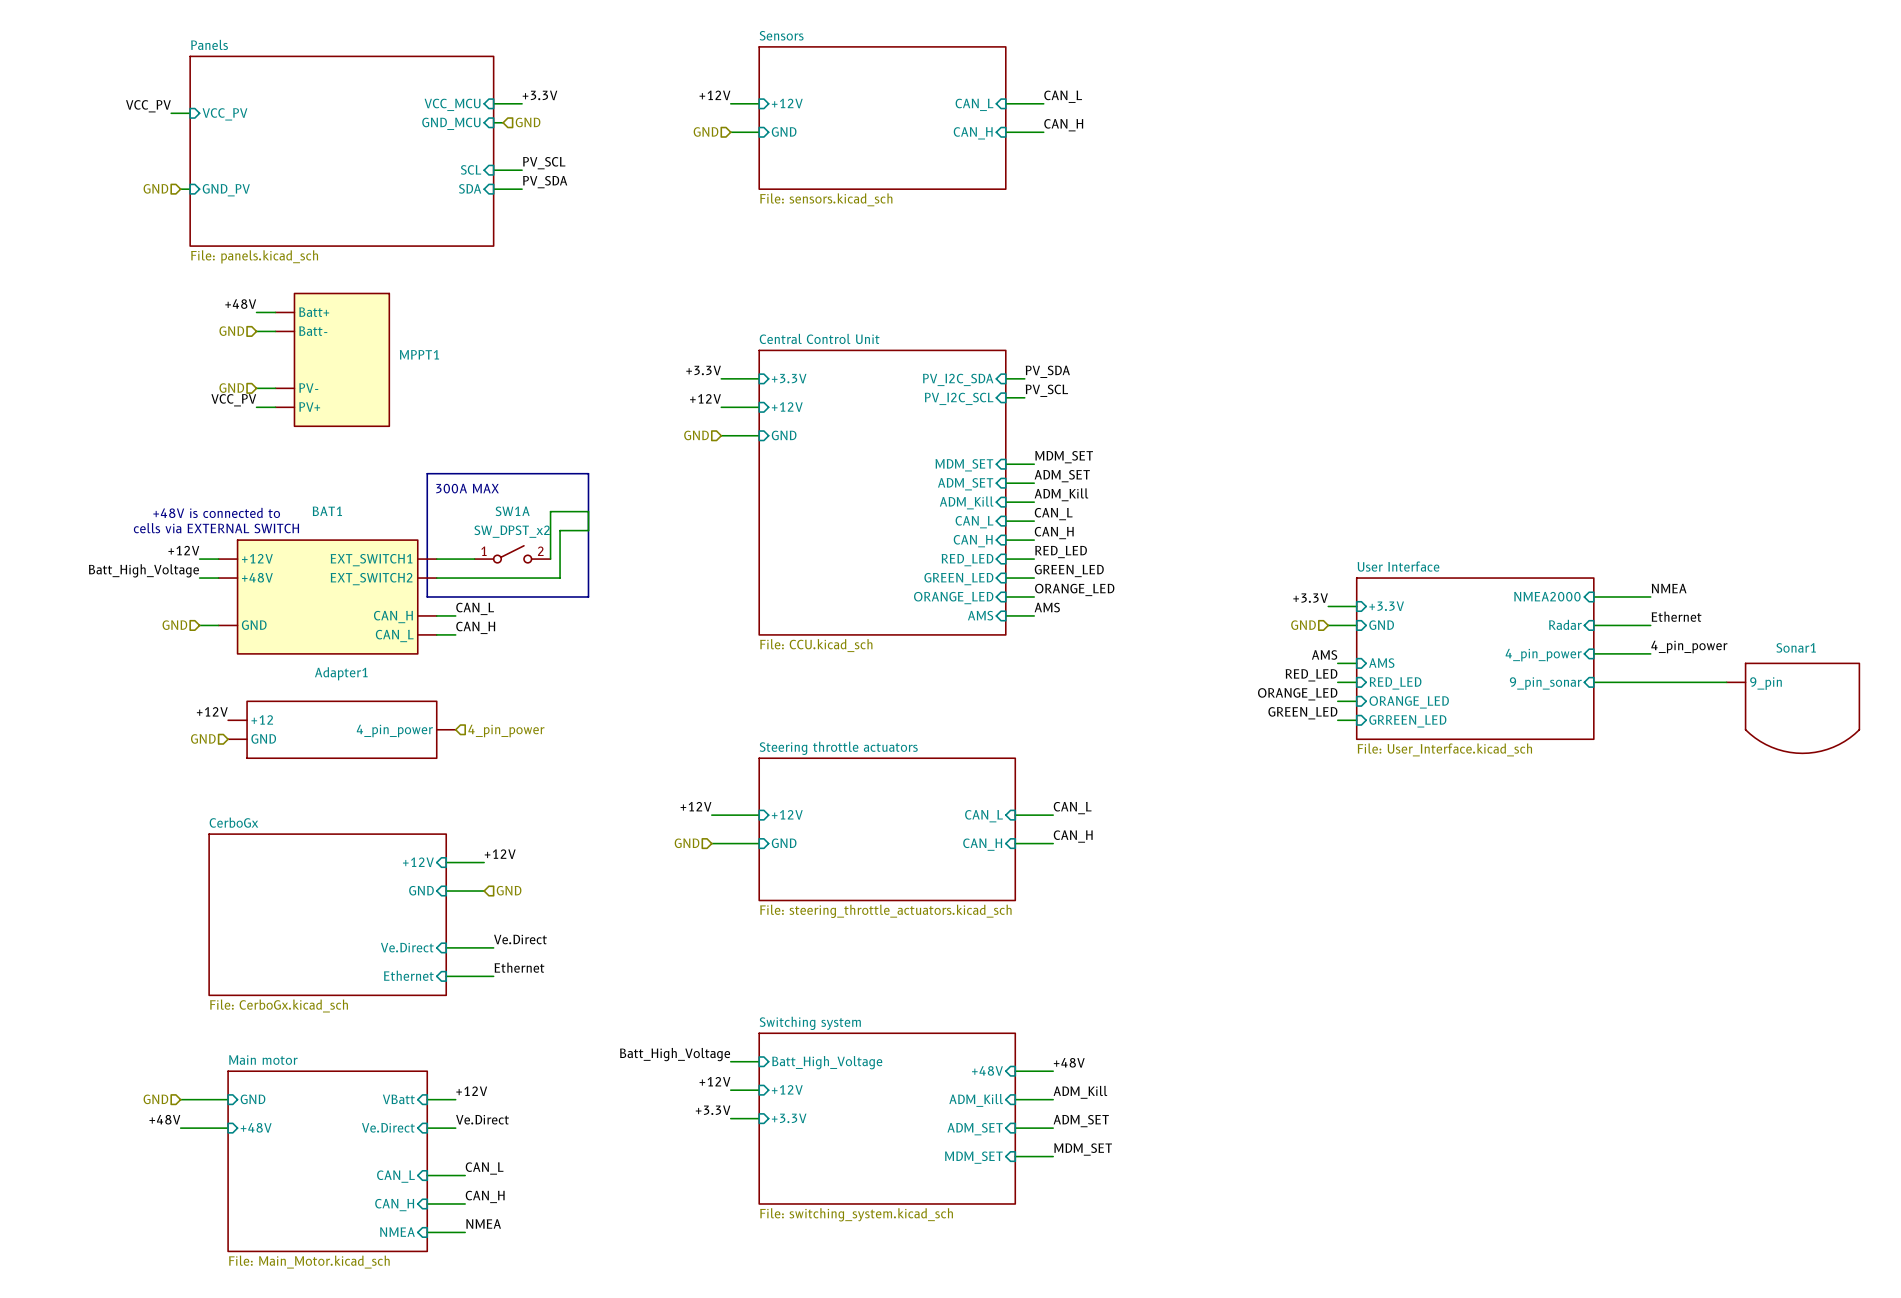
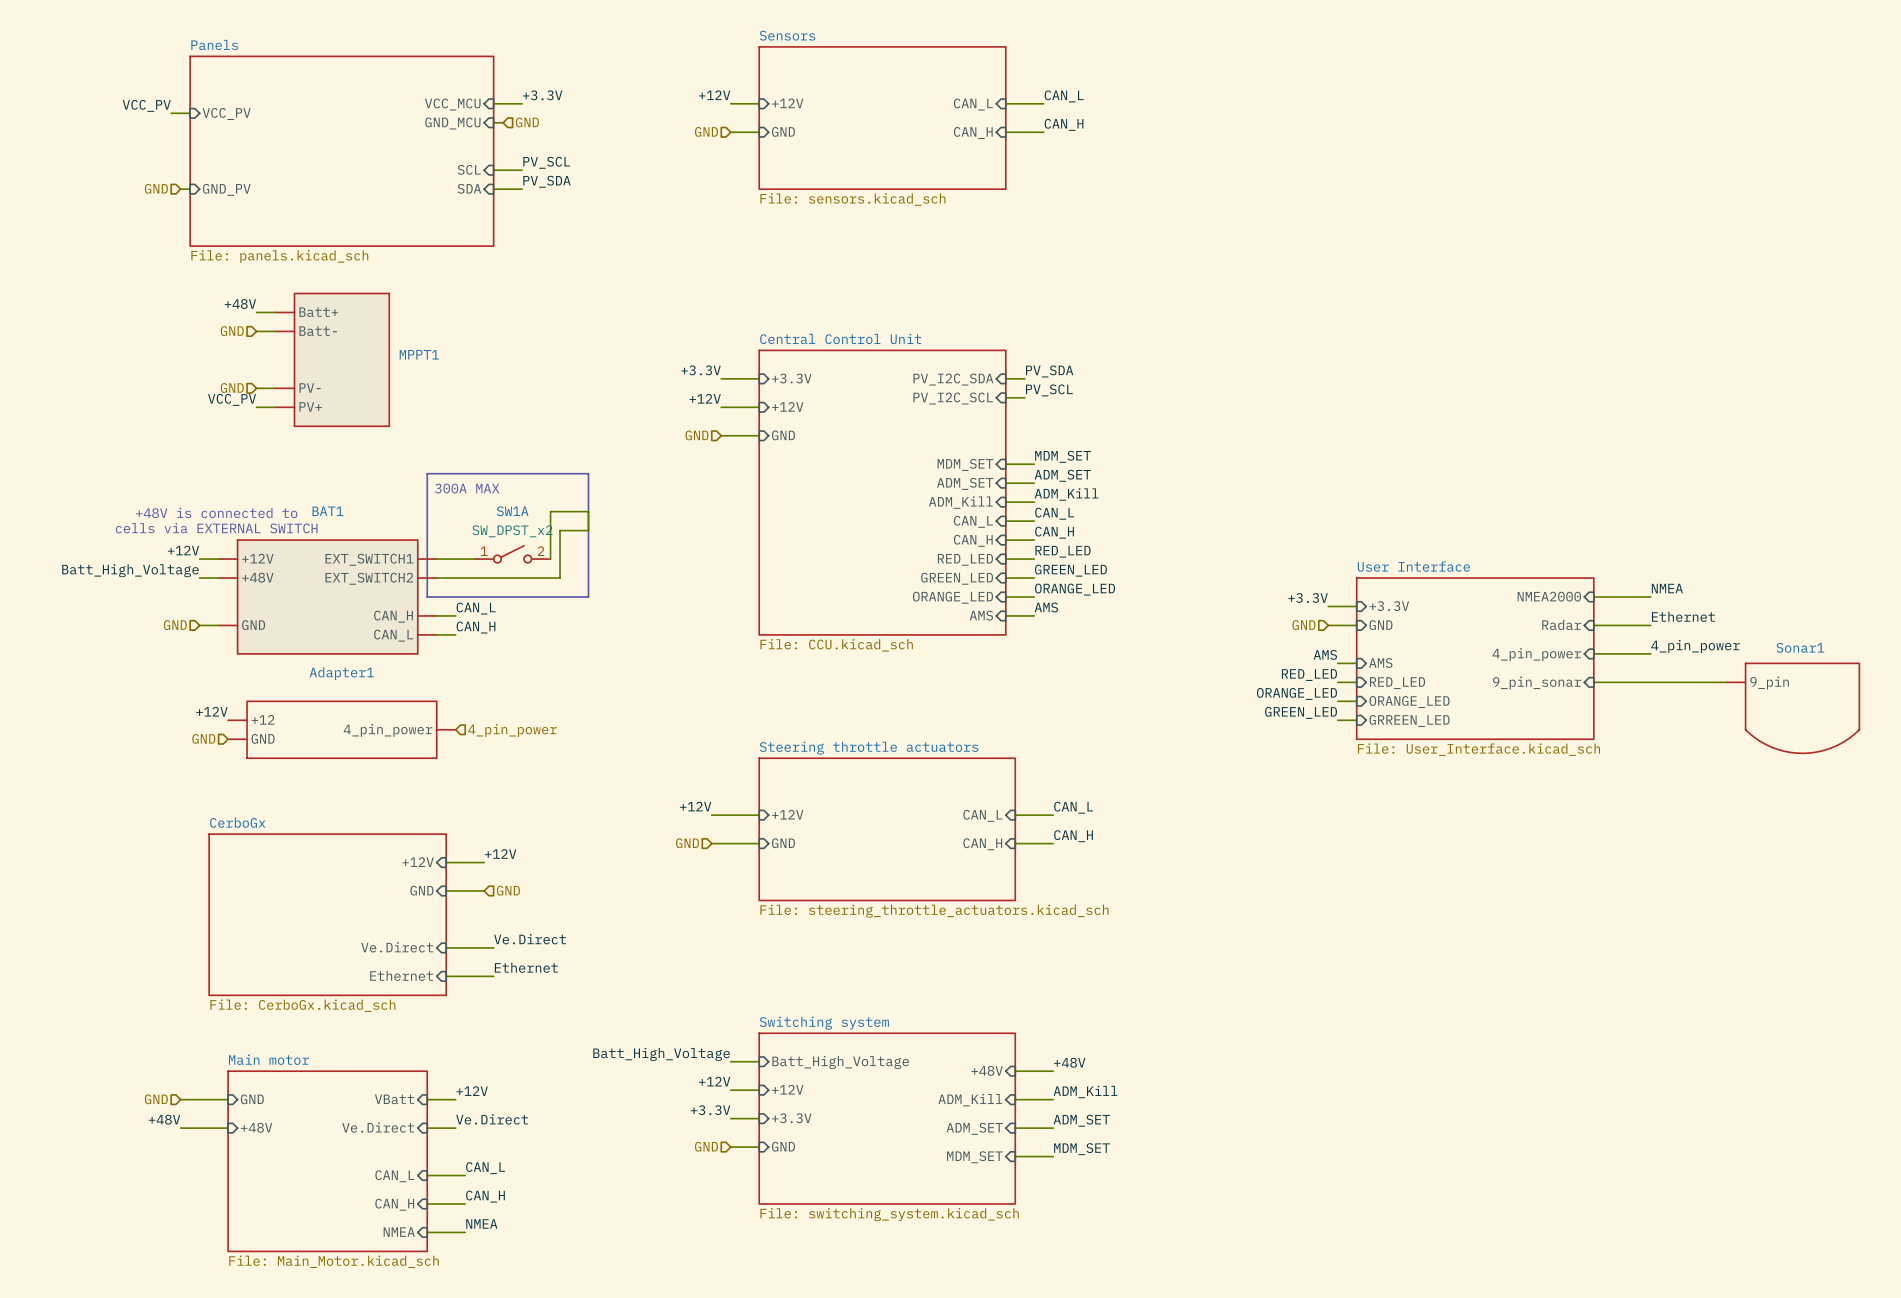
hierarchical label: none -> GND (706, 1146)
sheet pin: none -> GND (783, 1146)
wire: none -> (730, 1147) (759, 1147)

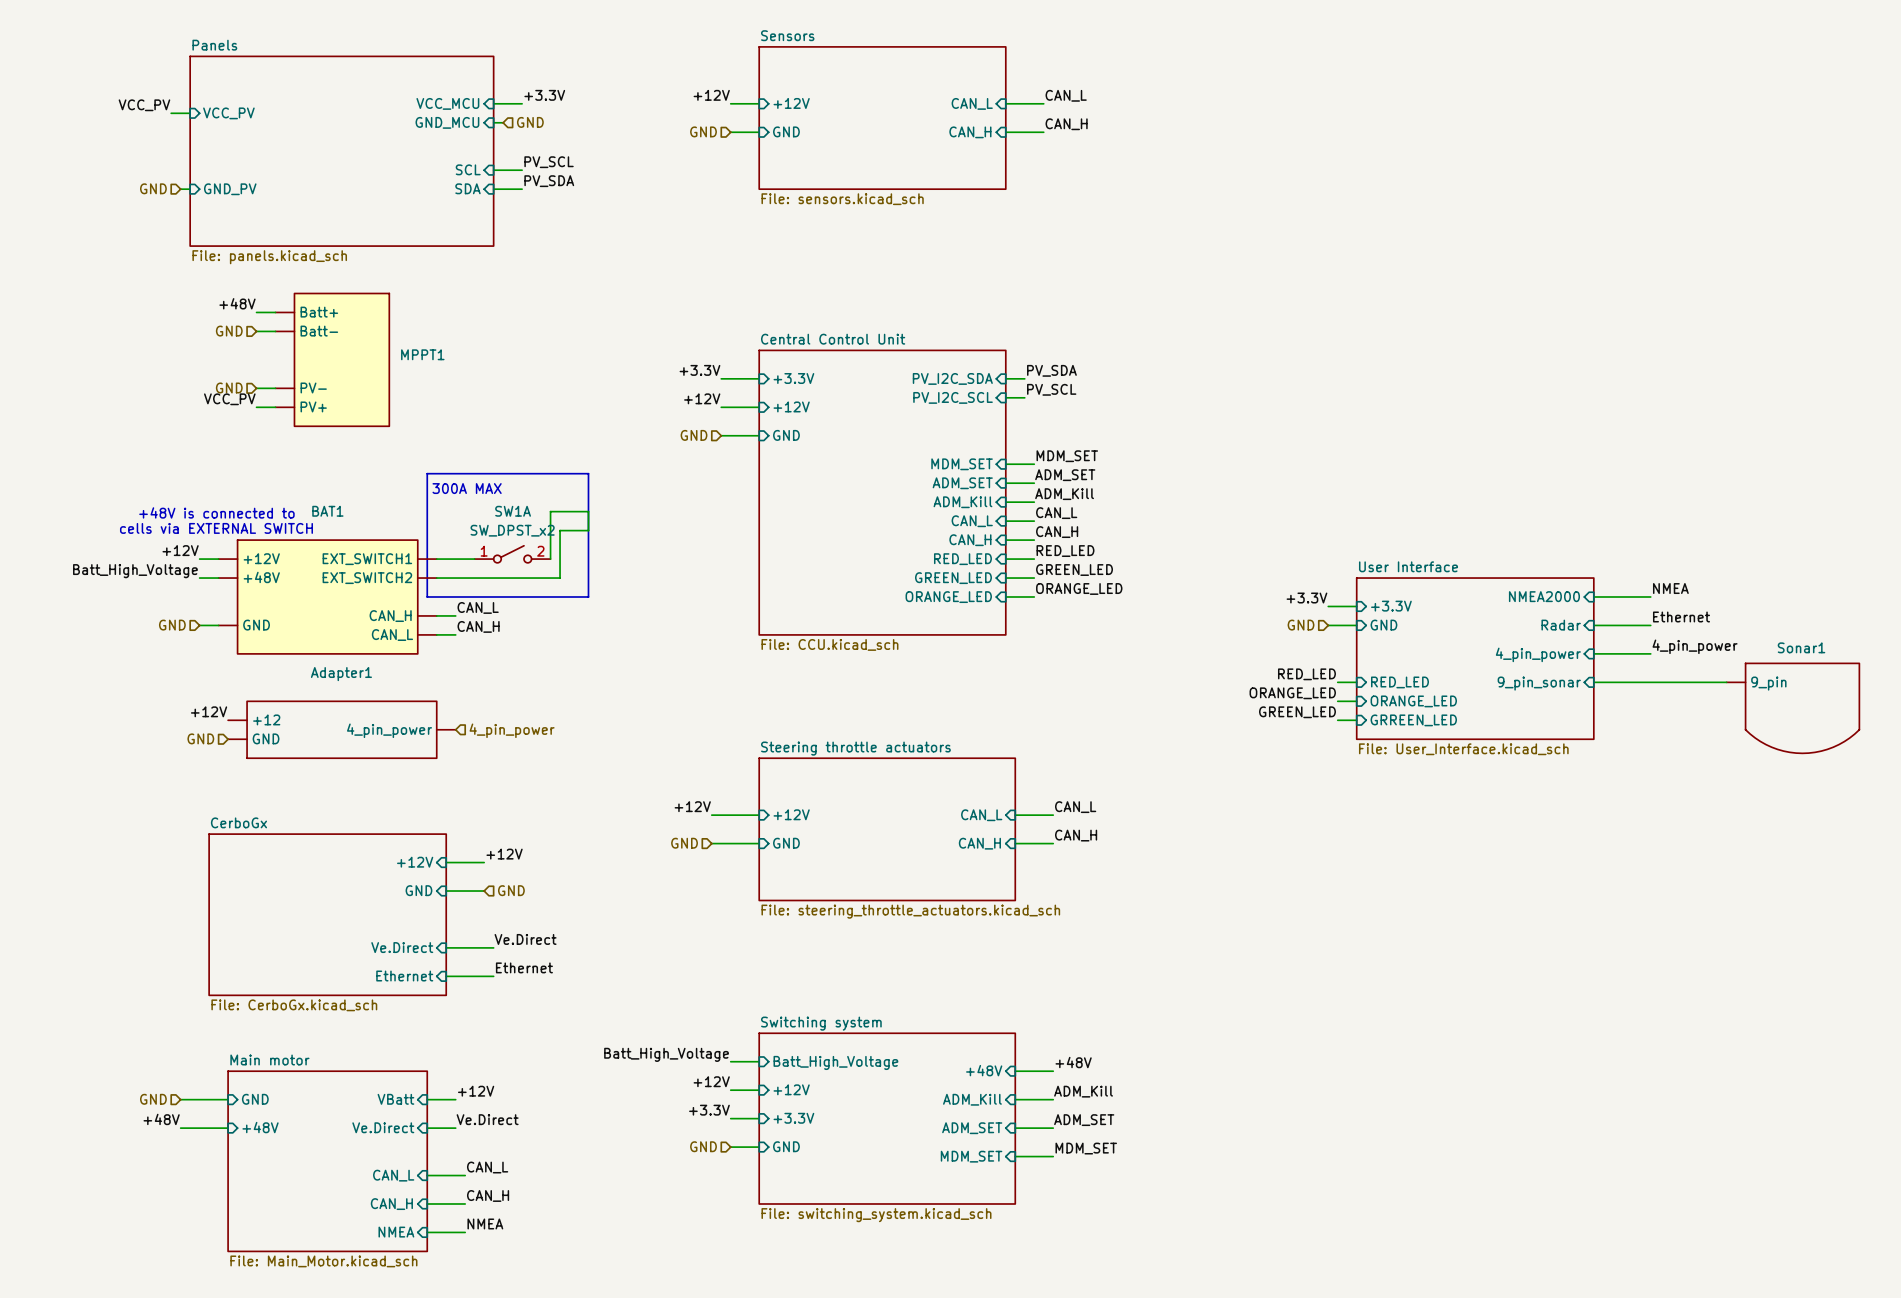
label: AMS (1046, 607) -> none
sheet pin: AMS (981, 615) -> none
wire: (1005, 615) (1034, 615) -> none
label: AMS (1325, 654) -> none
wire: (1337, 663) (1356, 663) -> none
sheet pin: AMS (1380, 663) -> none

